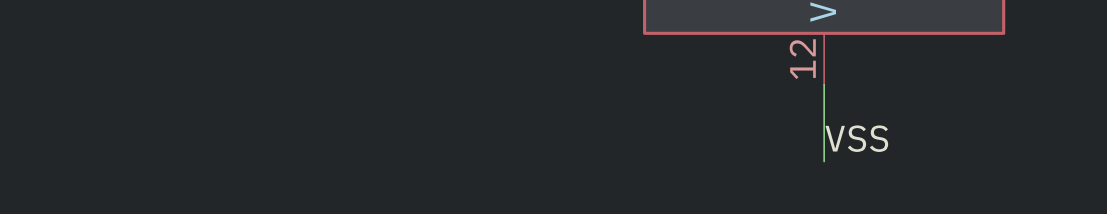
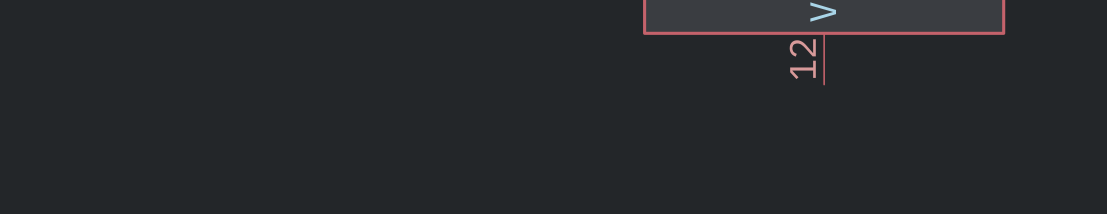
wire: (824, 84) (824, 161) -> none
label: VSS (856, 138) -> none

